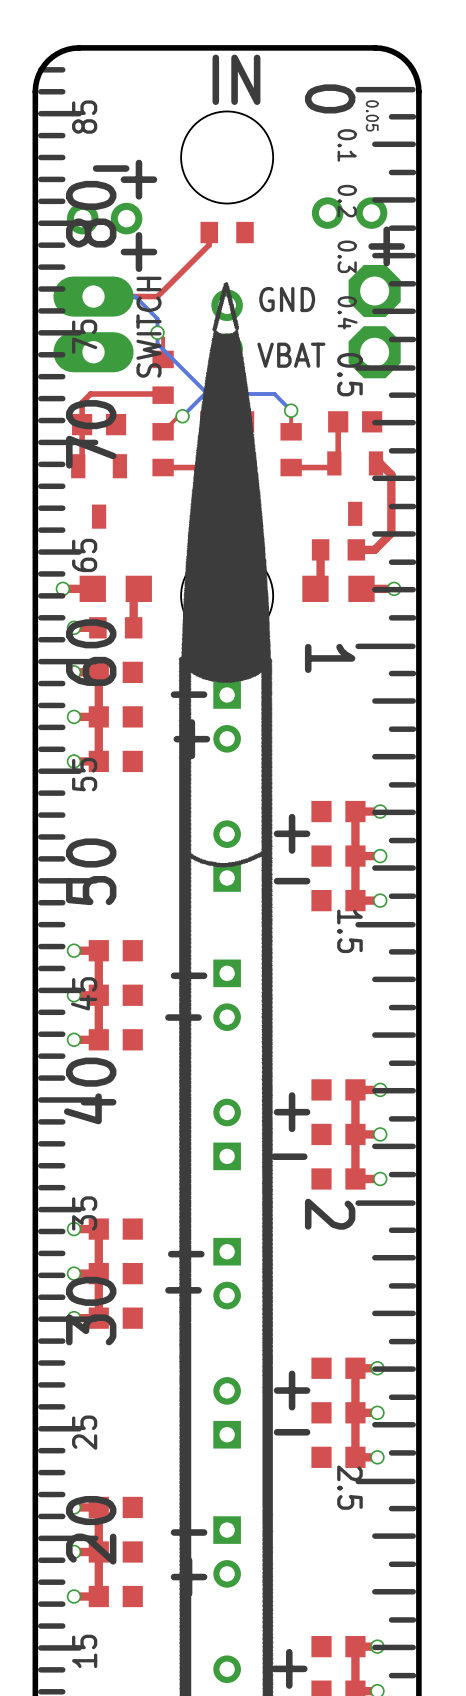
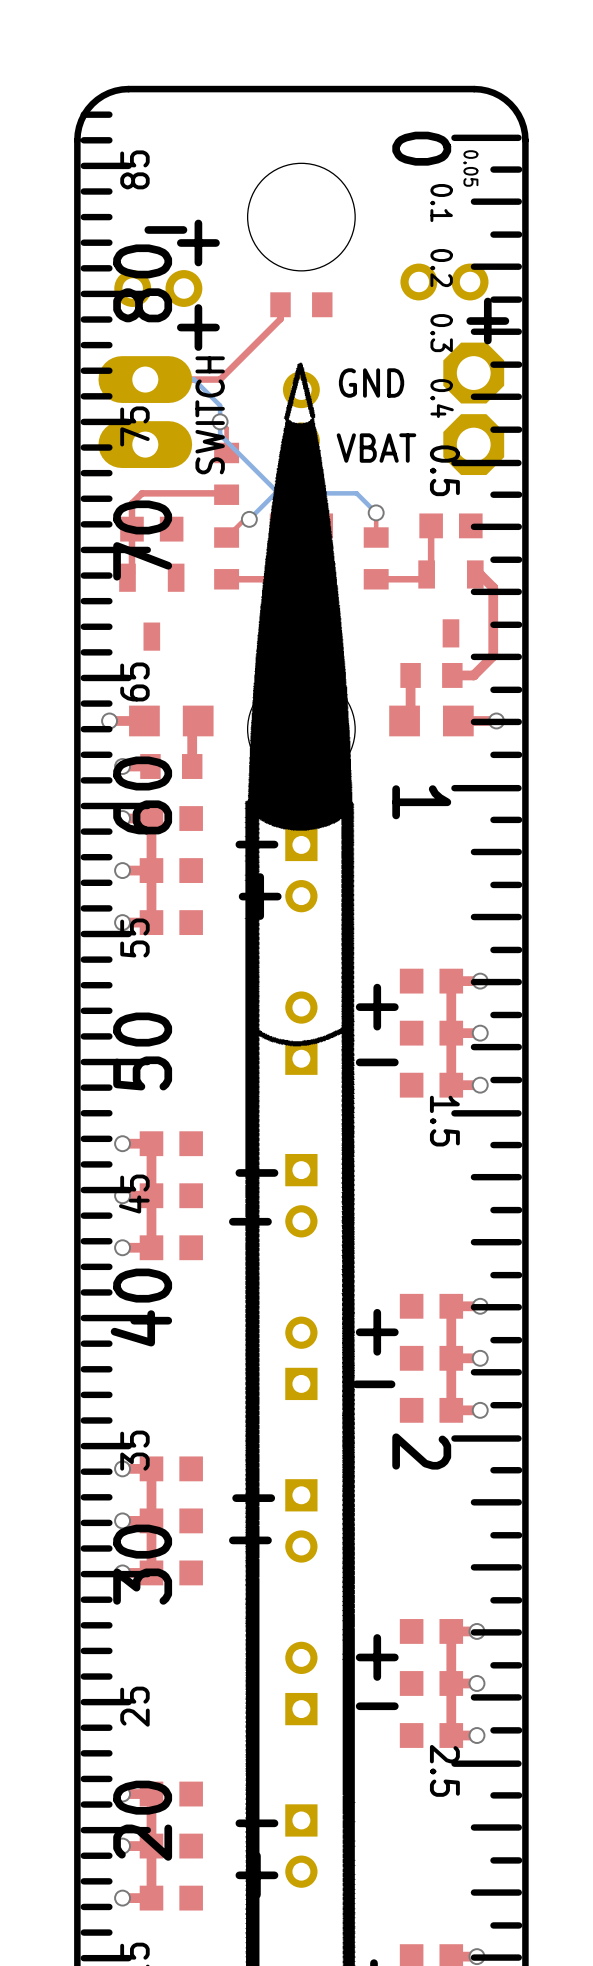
text: IN (236, 79) -> none

